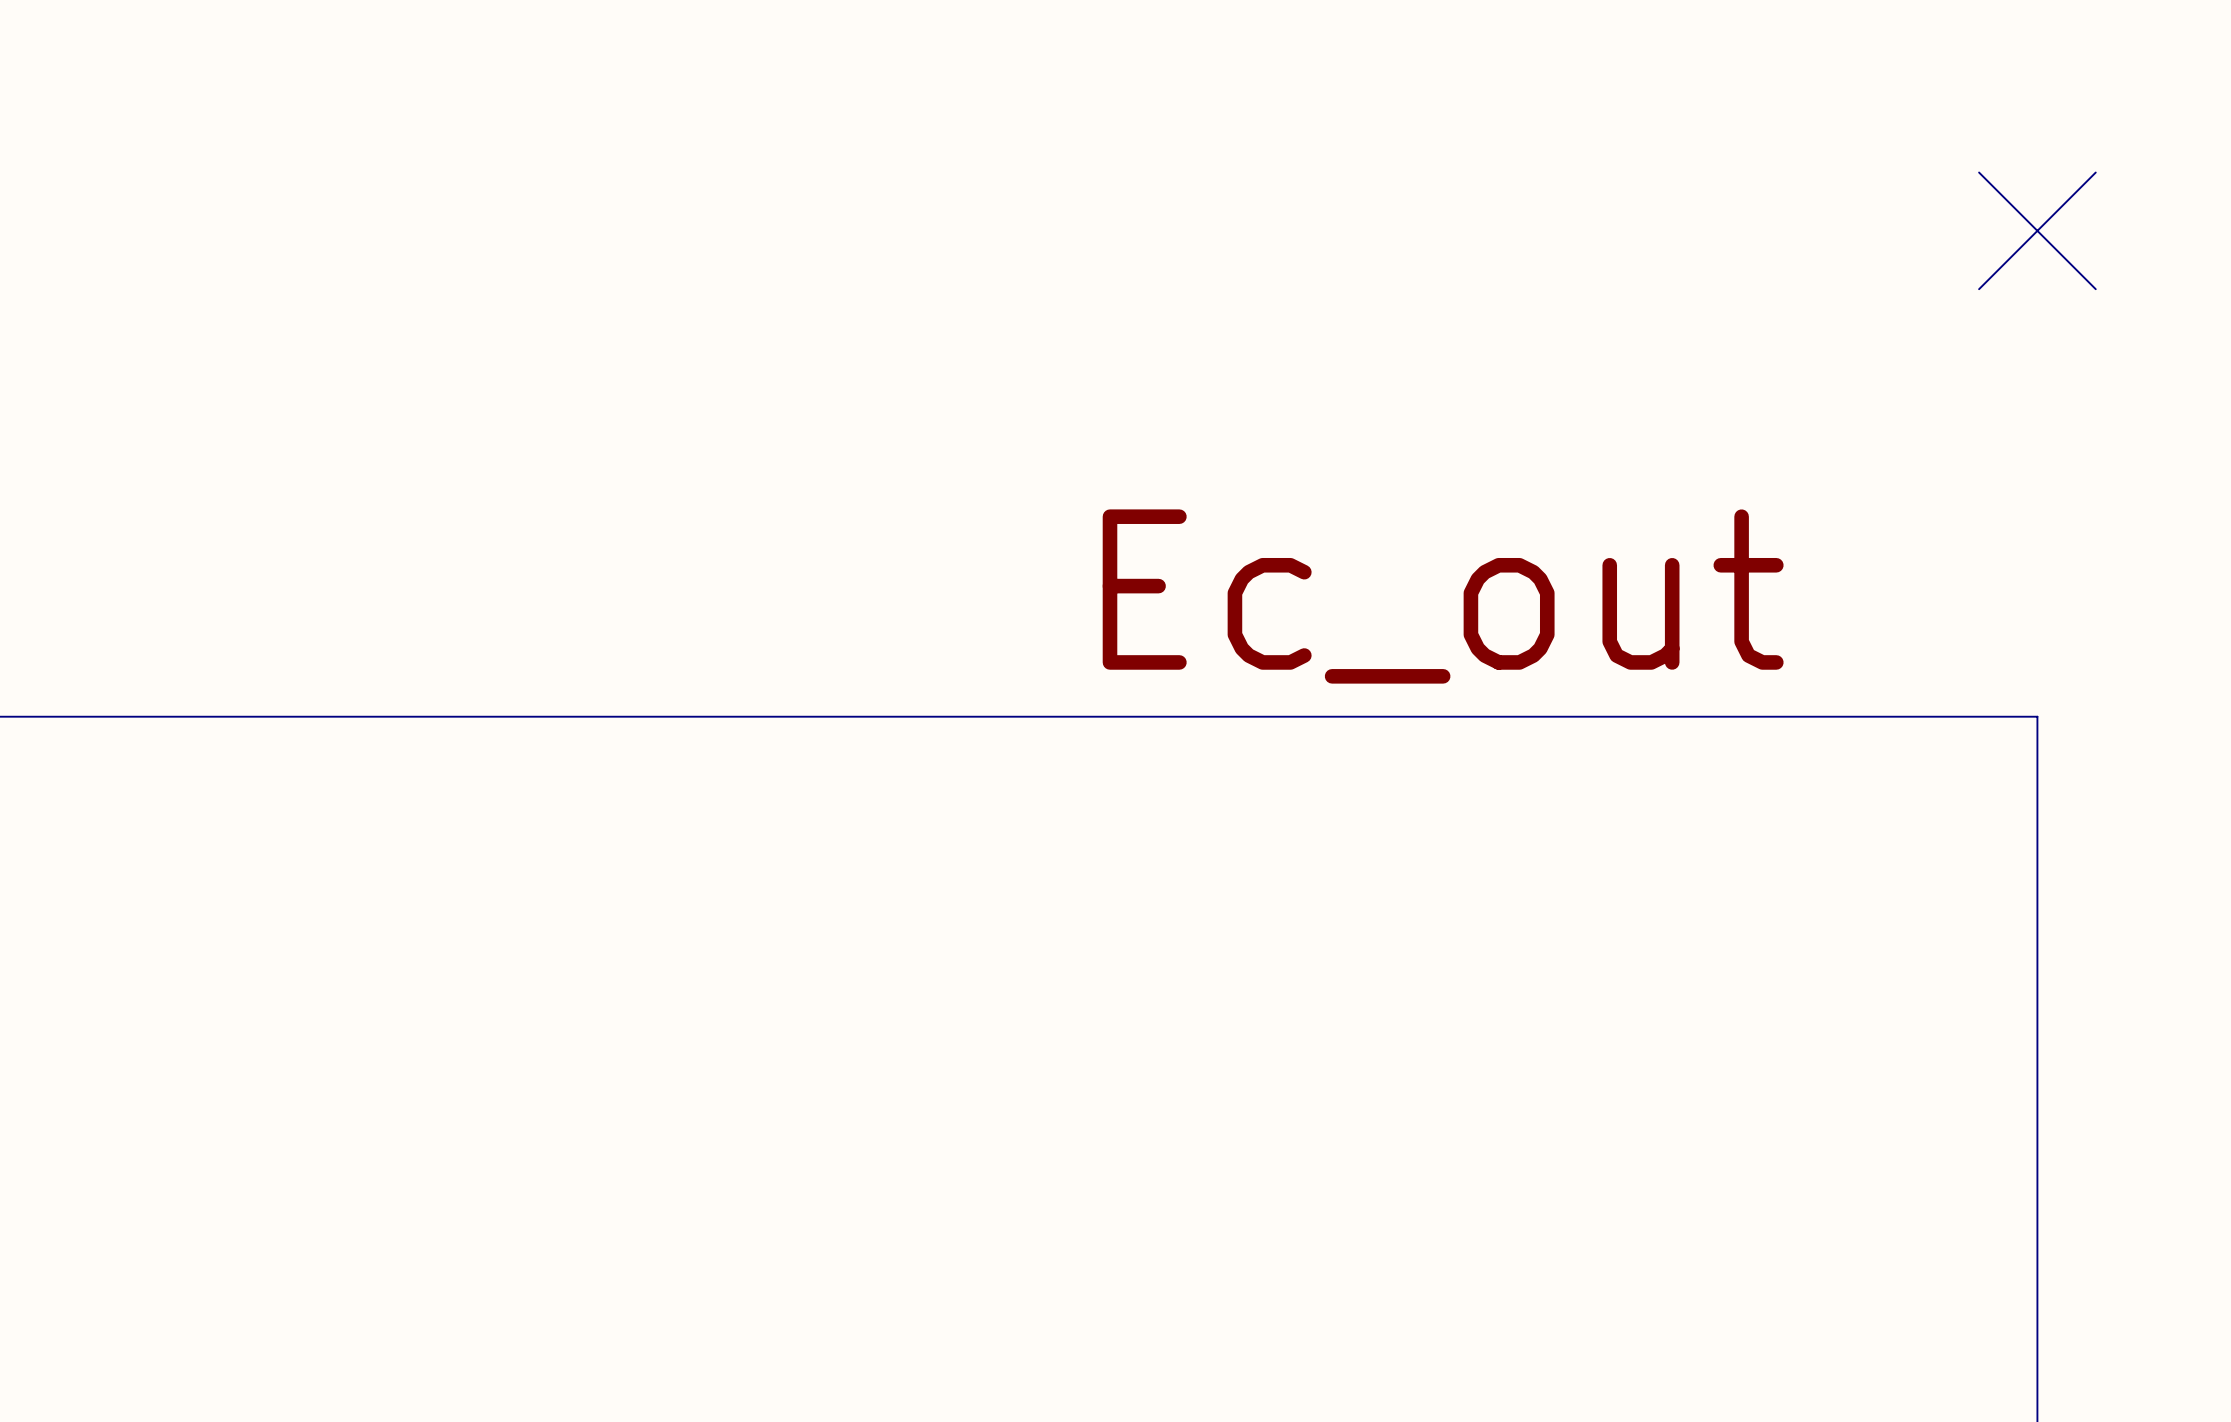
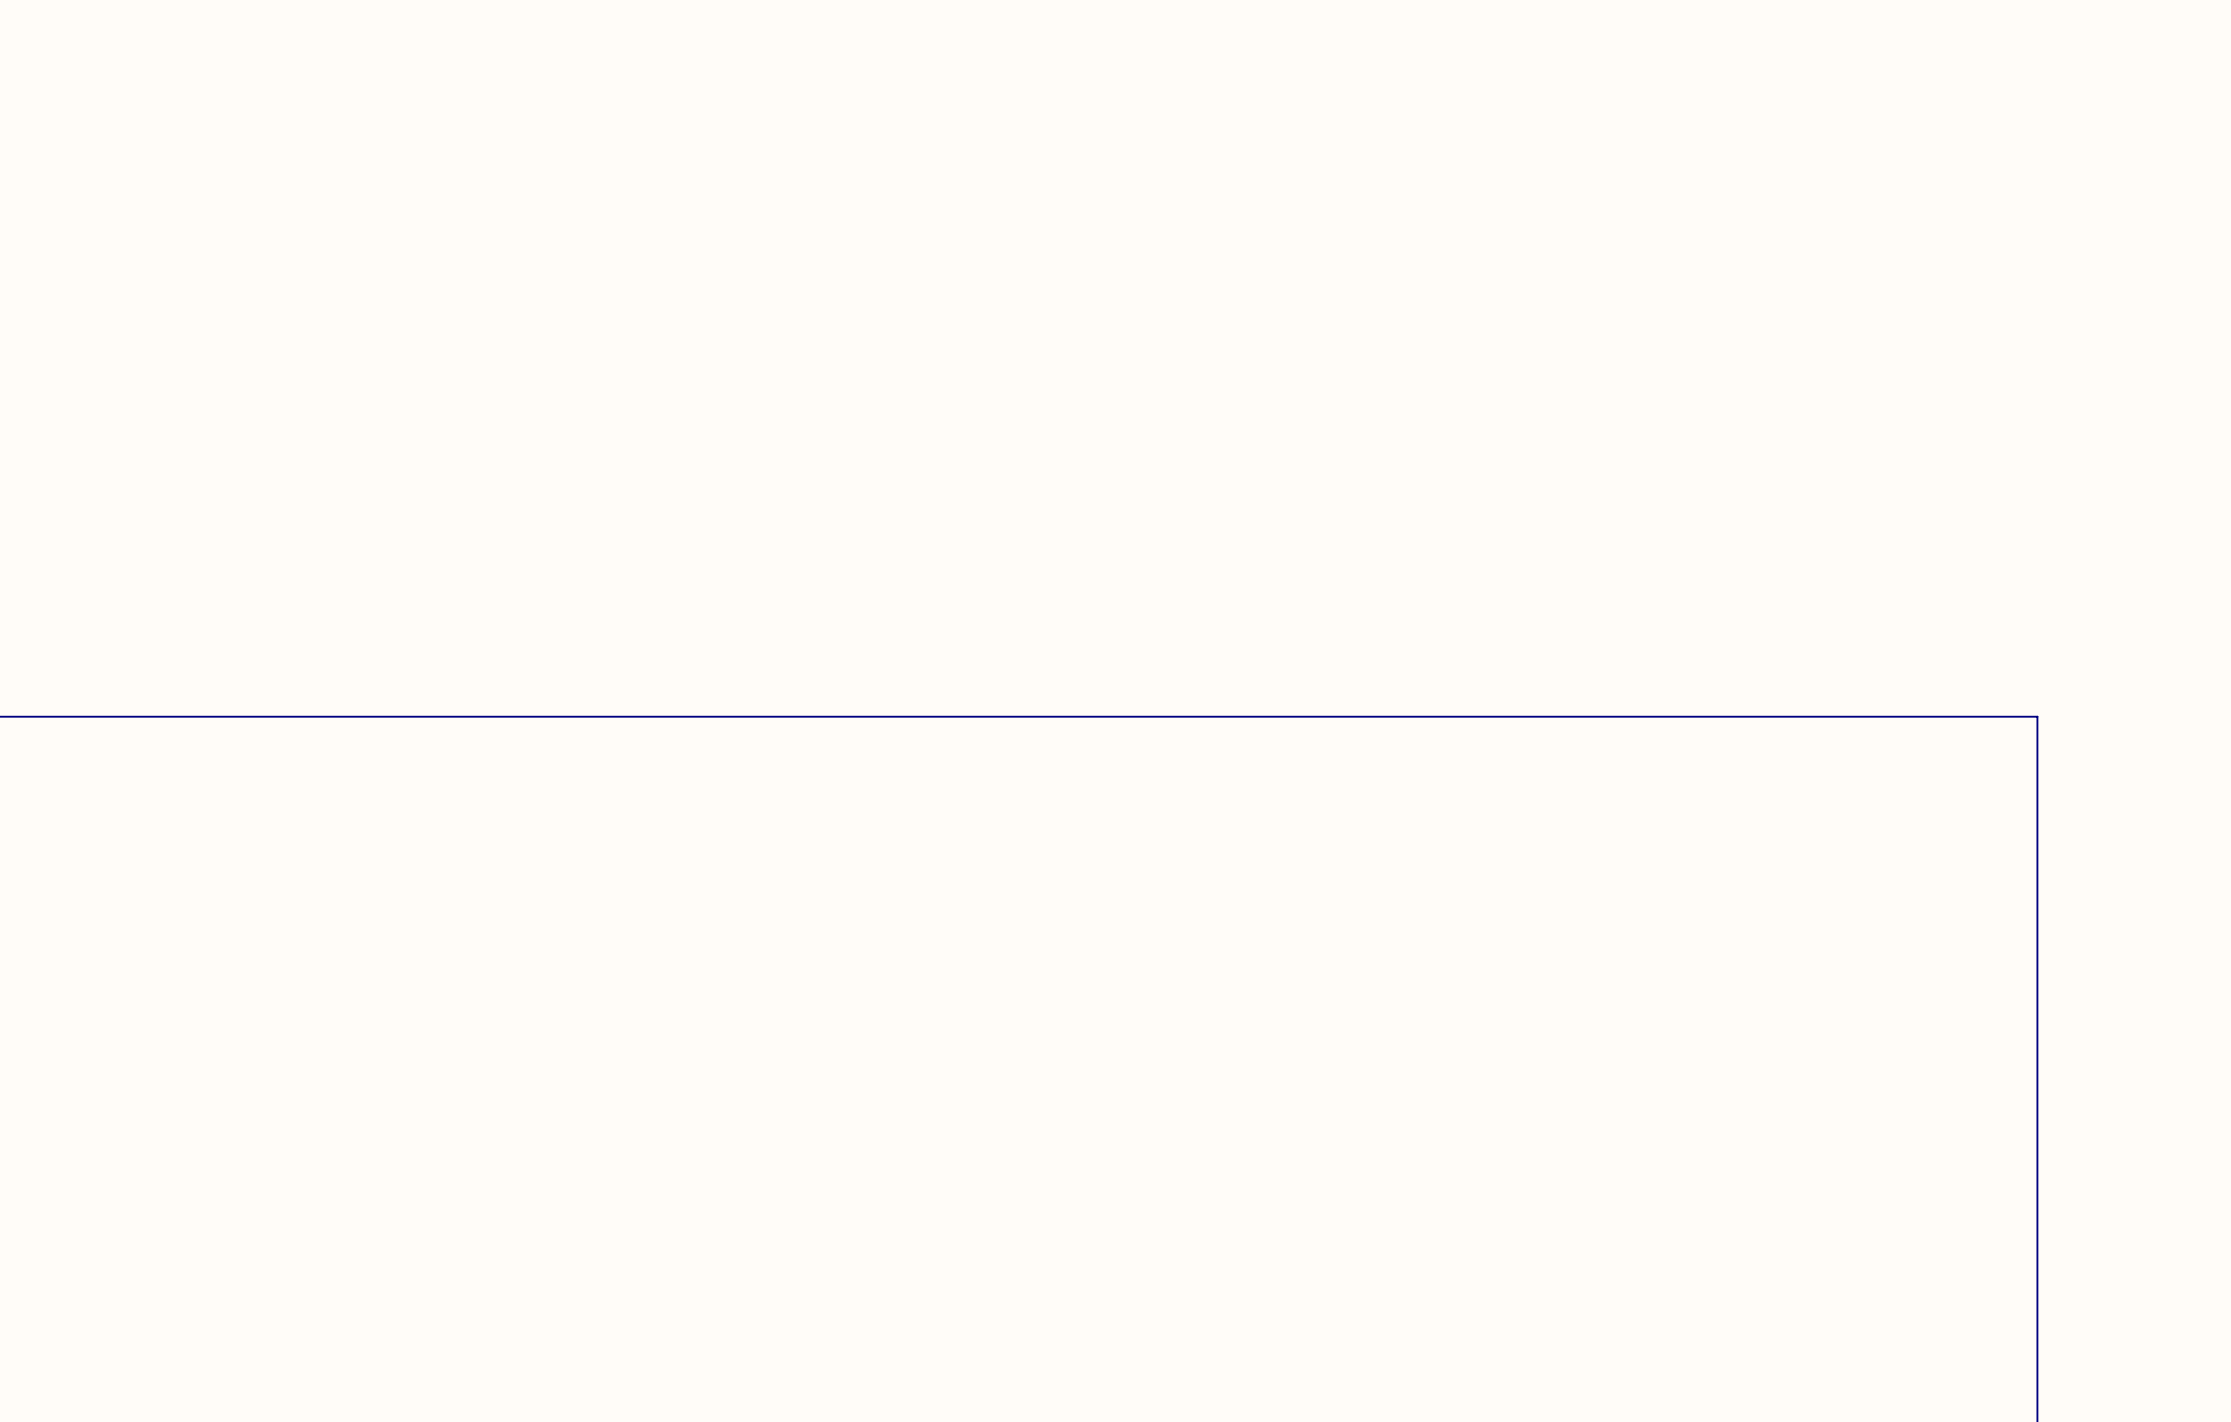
no-connect mark: (2037, 230) -> none
label: Ec_out (1443, 596) -> none

